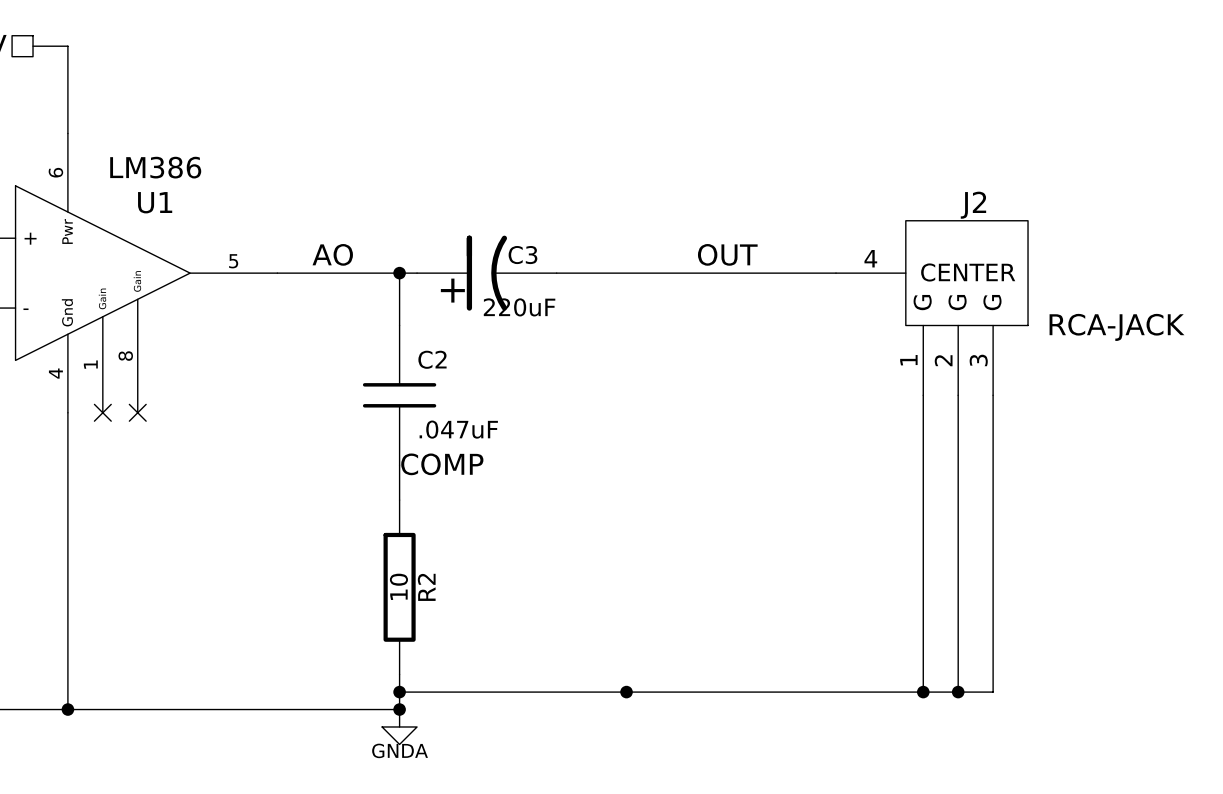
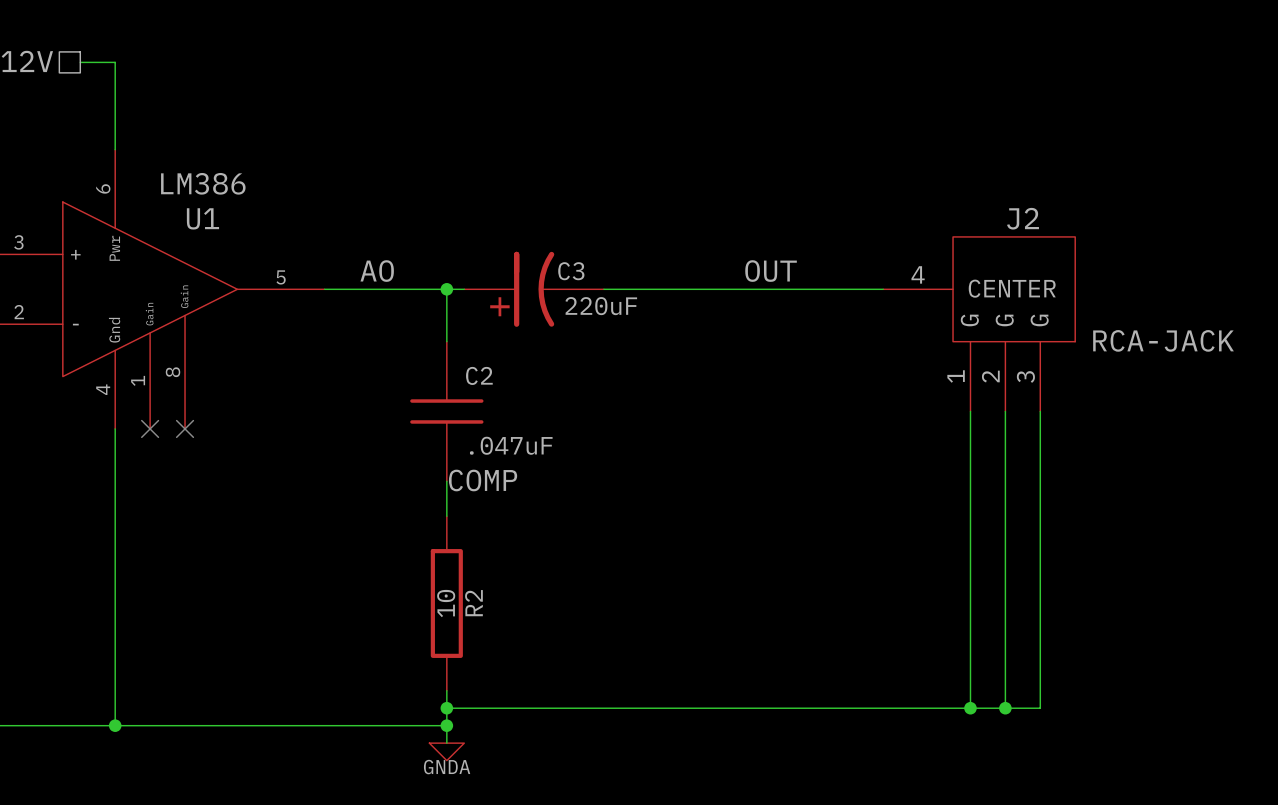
C3 value position: 220uF (519, 307) -> 220uF (601, 306)
junction: (626, 692) -> none

